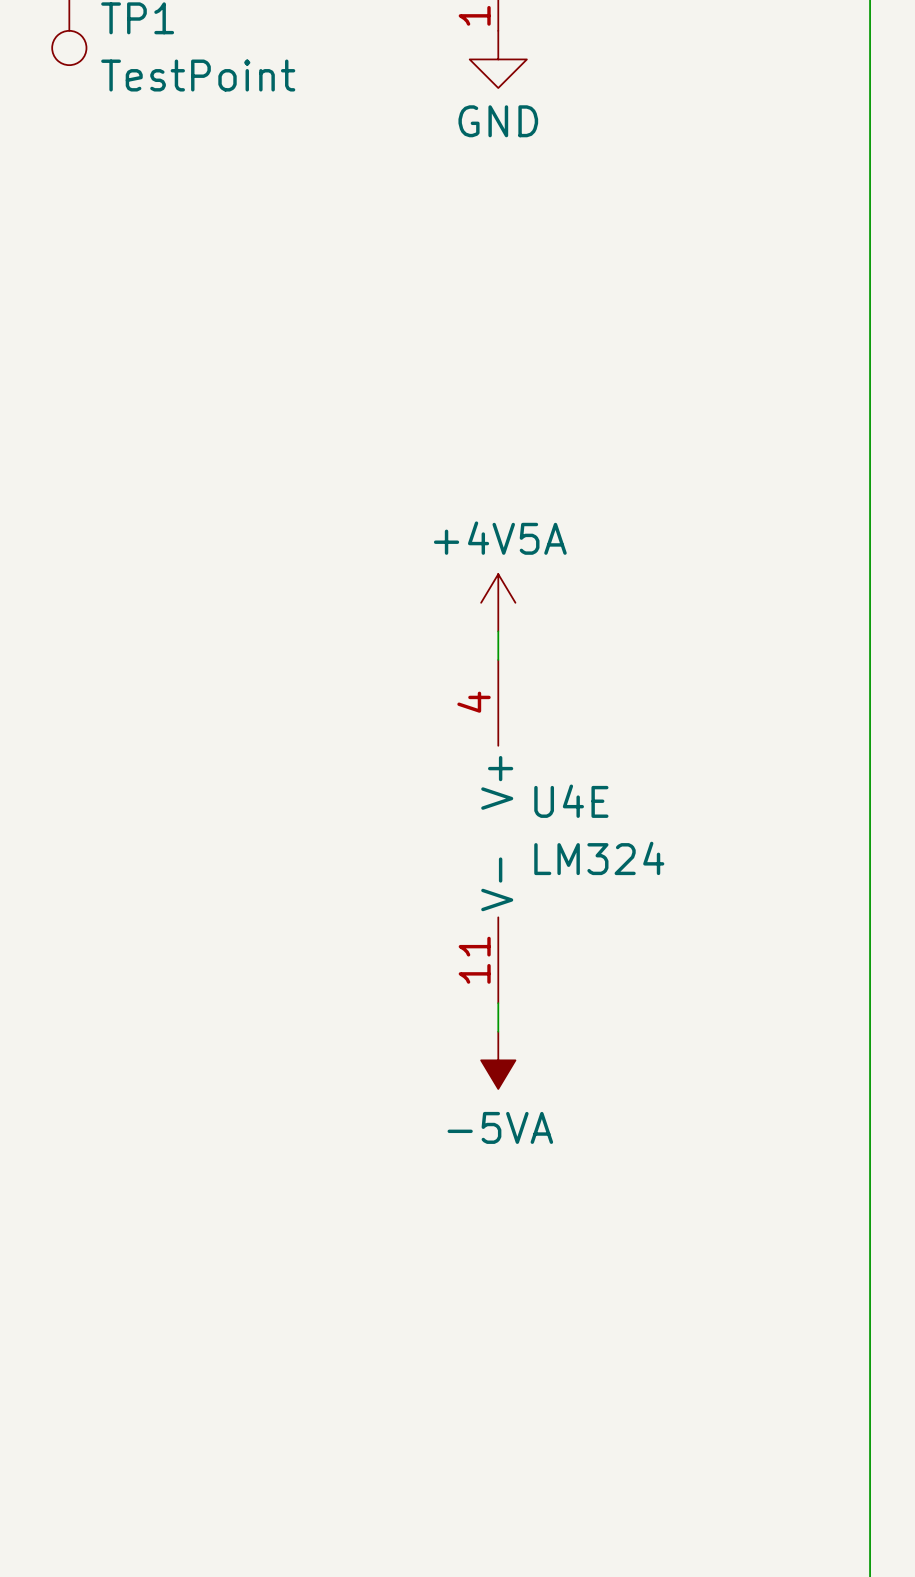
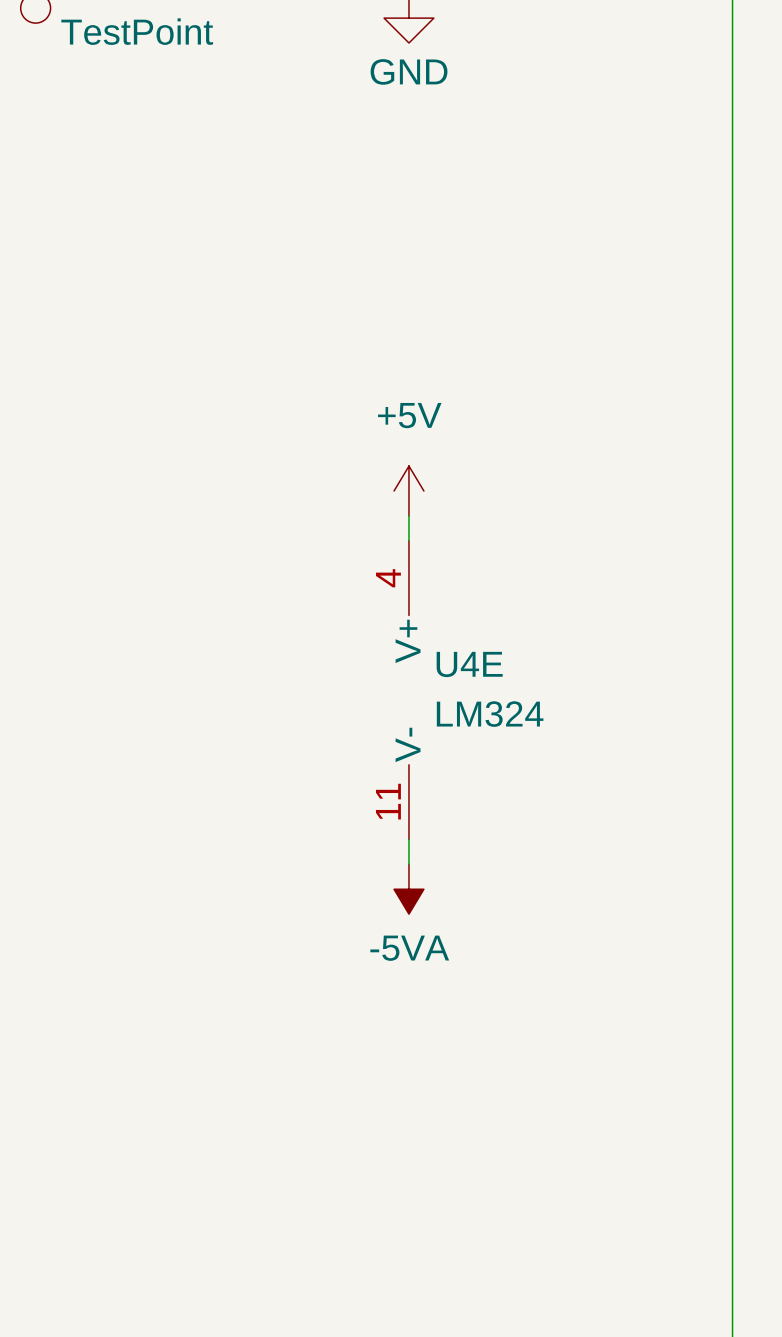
power symbol: +4V5A (498, 602) -> +5V (408, 491)

